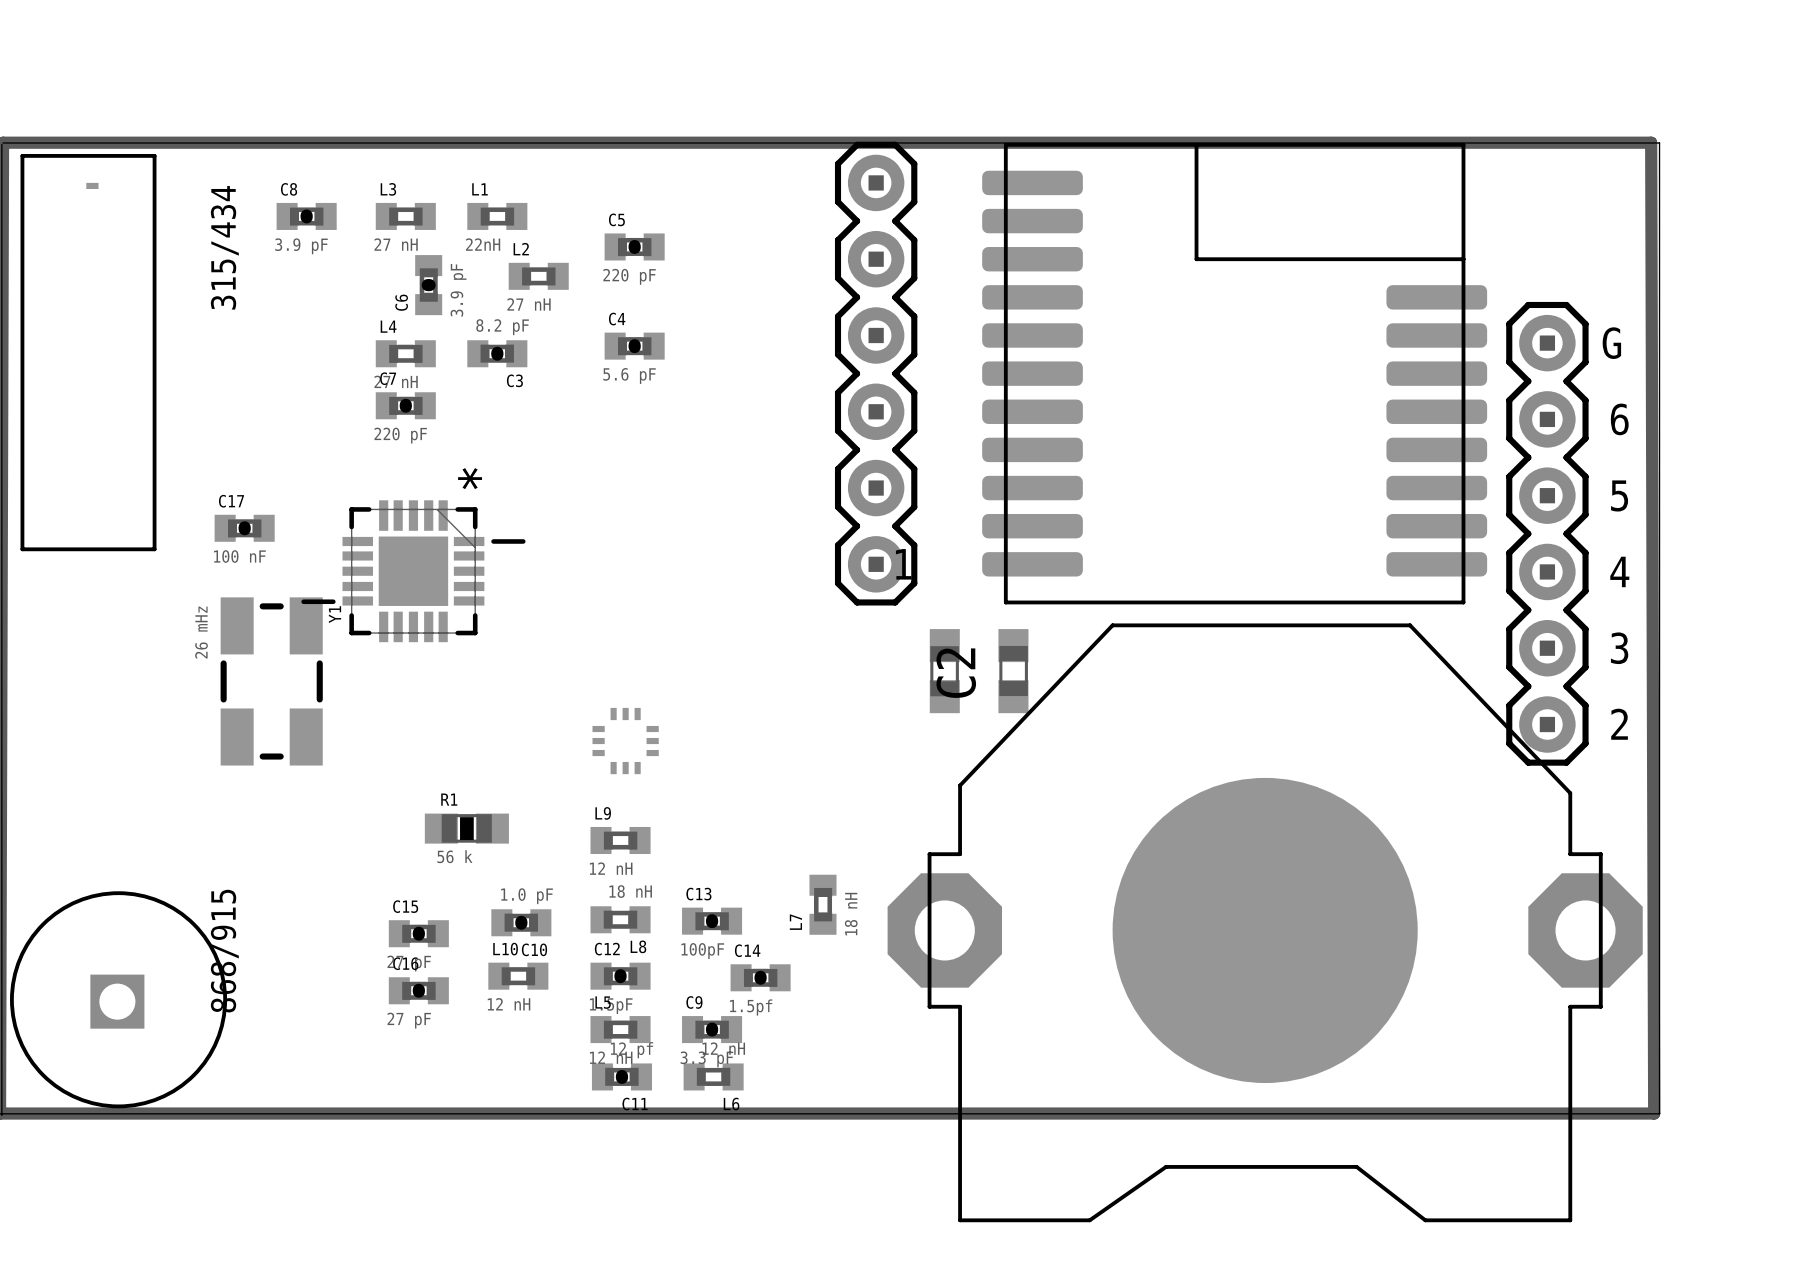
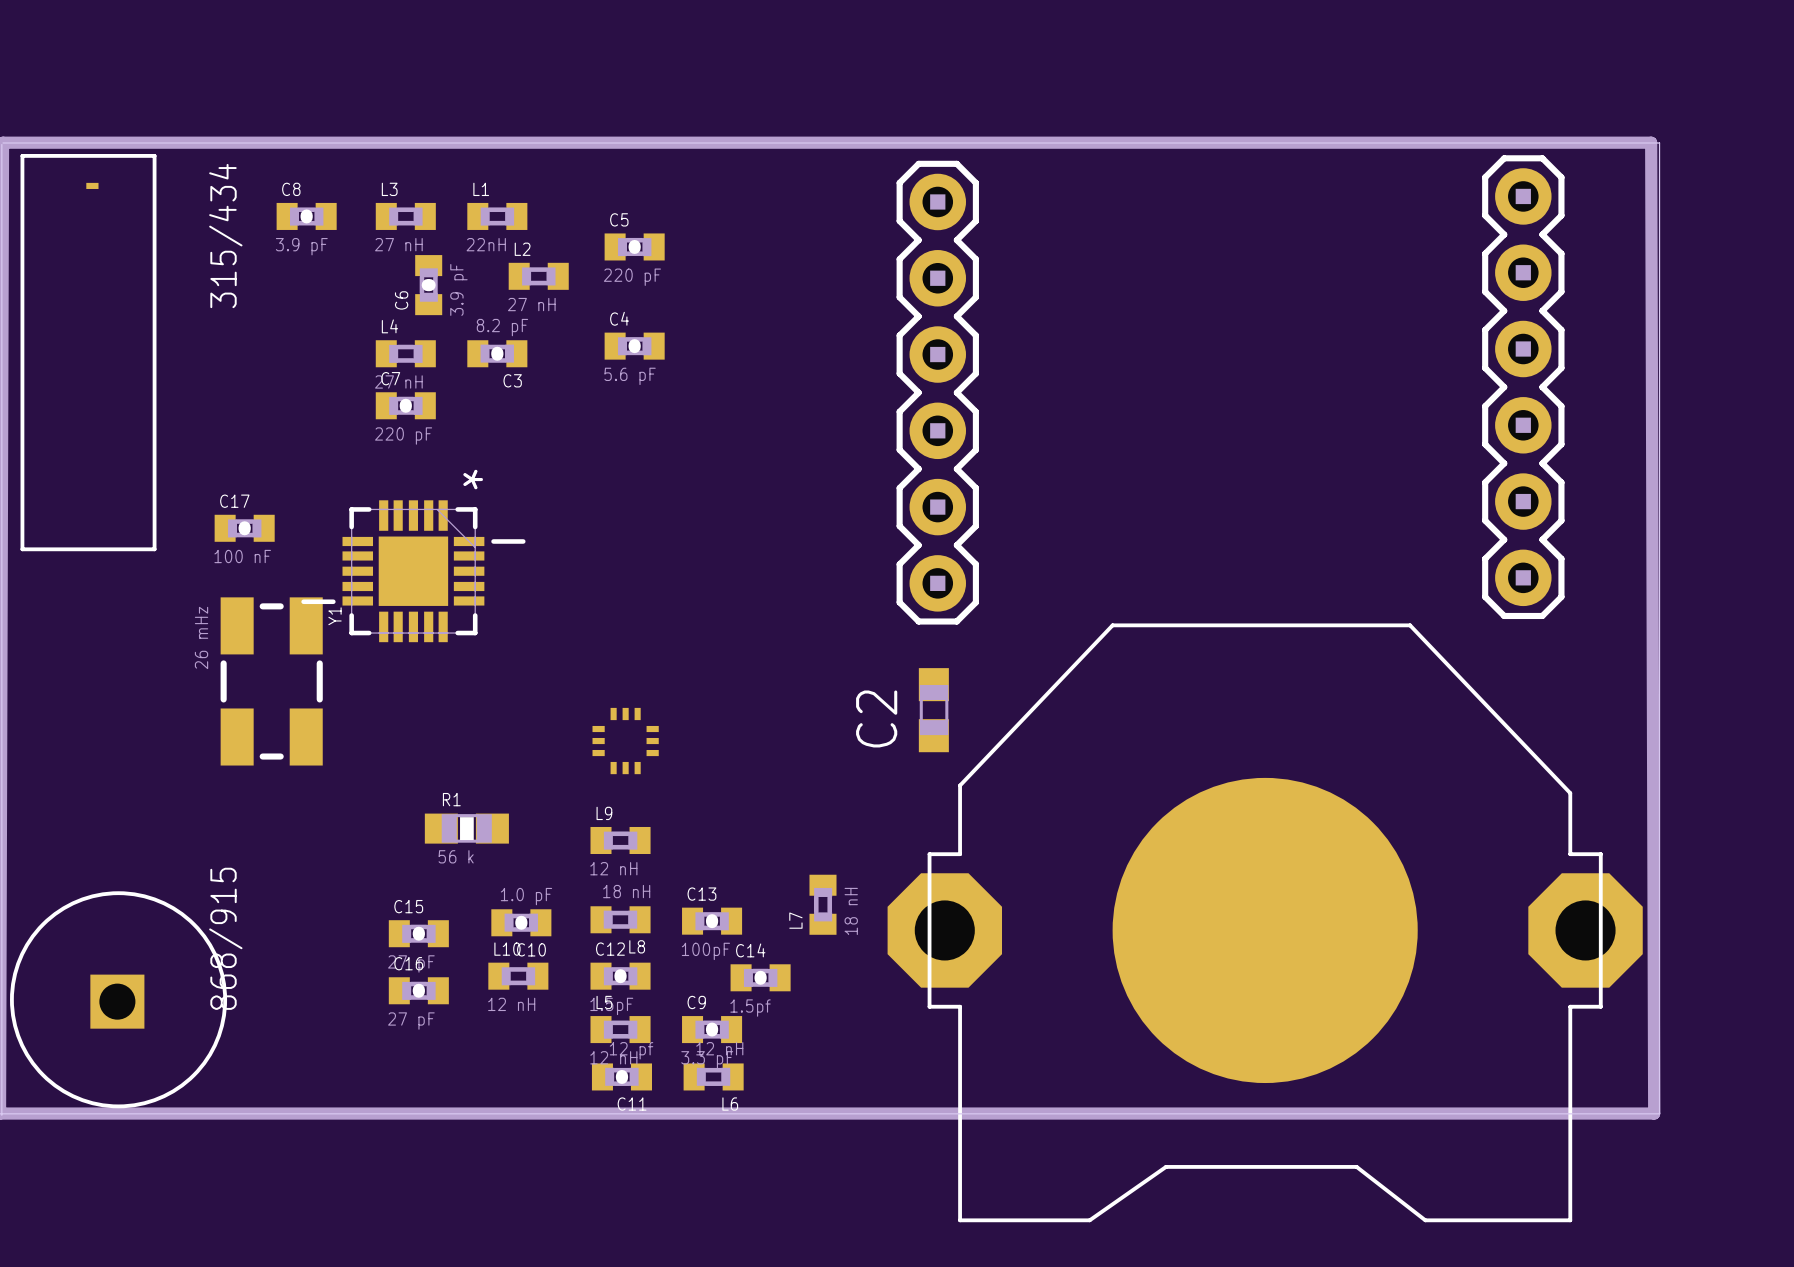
text: G (1611, 343) -> none
part position: (876, 373) -> (937, 392)
part: (1234, 373) -> none
text: 6 (1619, 419) -> none
text: 5 (1619, 495) -> none
part position: (1547, 533) -> (1523, 387)
text: 1 (903, 564) -> none
text: 4 (1619, 571) -> none
text: 3 (1619, 648) -> none
part: (944, 671) -> none
C2 position: (1013, 671) -> (933, 710)
text: 2 (1619, 724) -> none

